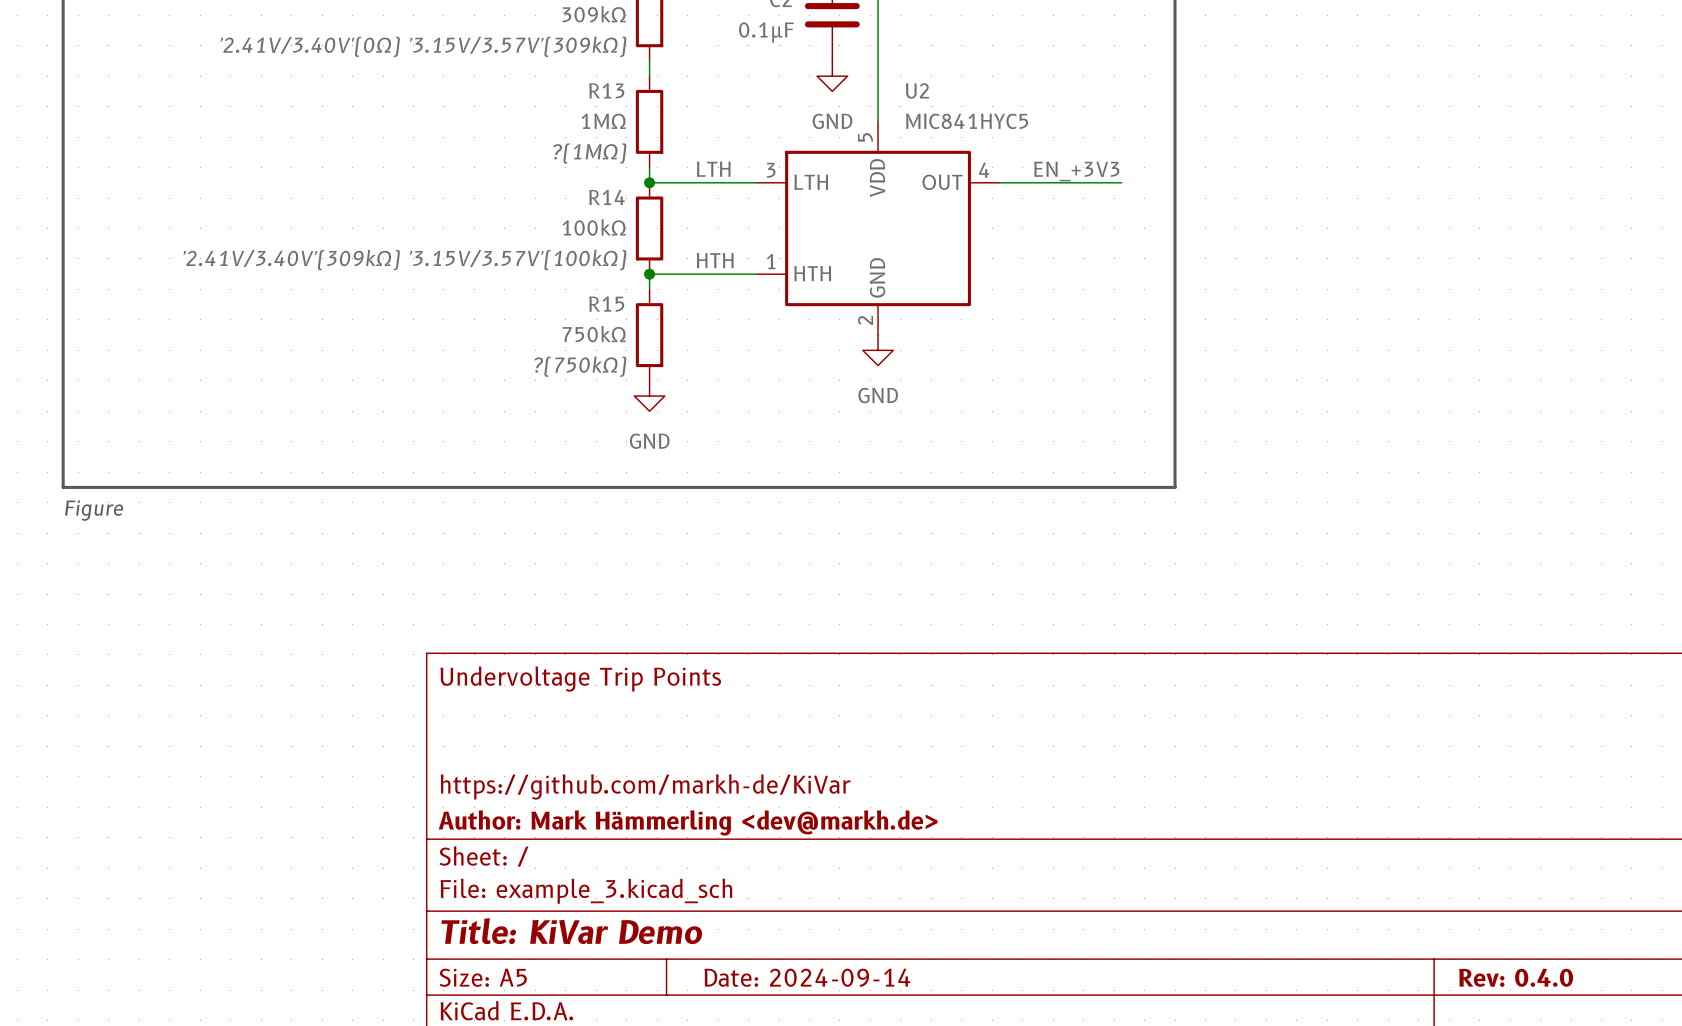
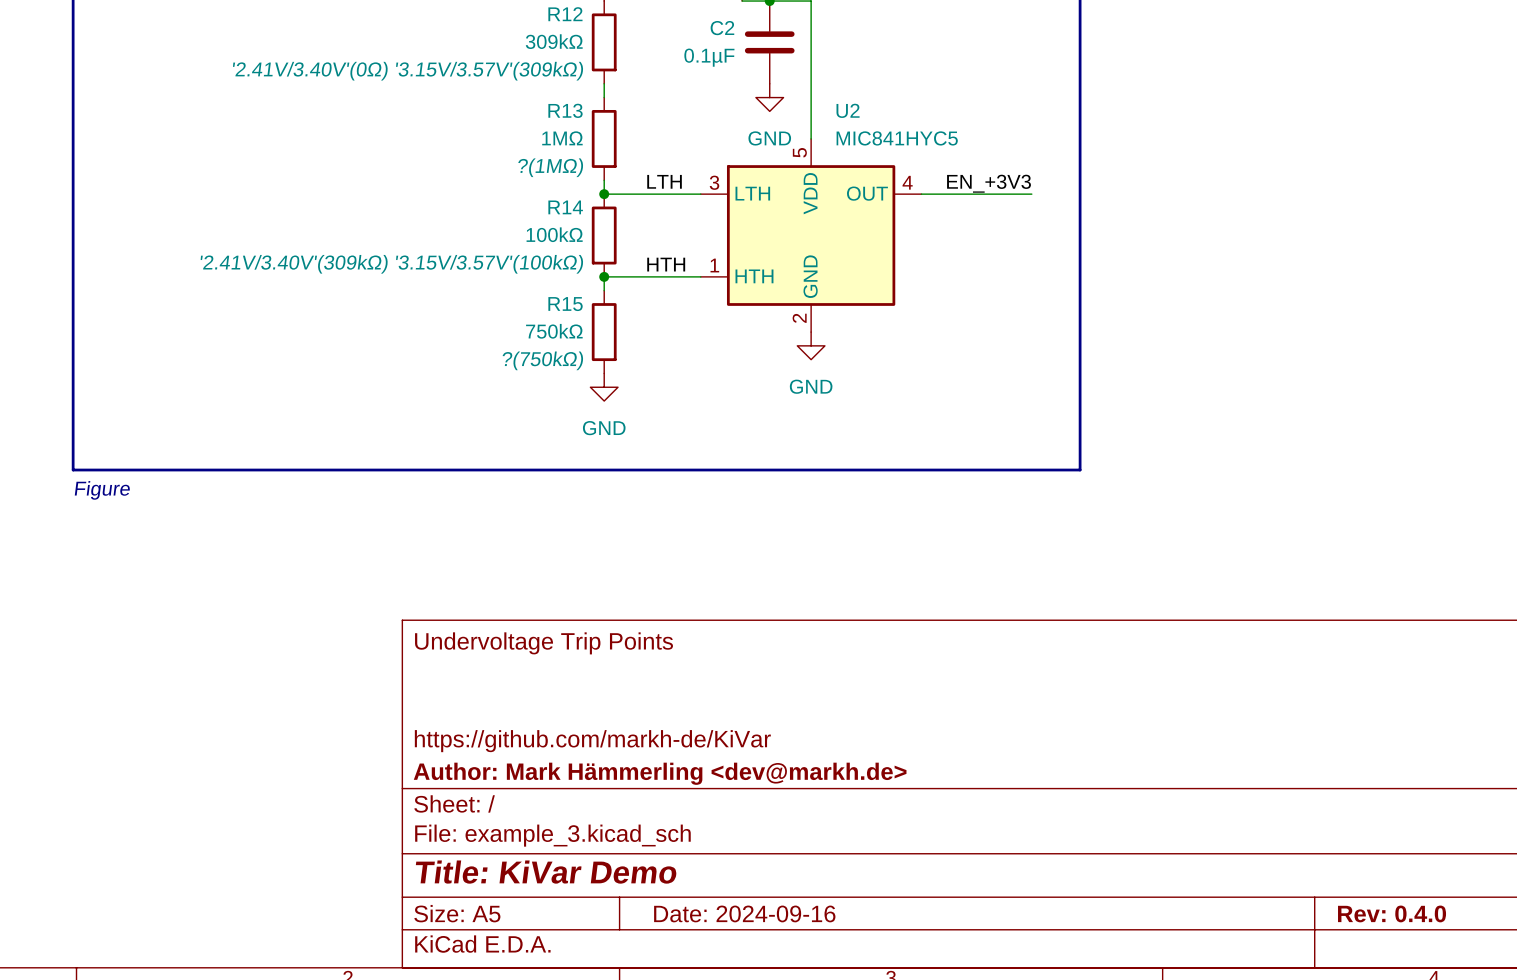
title block: Date: 2024-09-14 (807, 977) -> Date: 2024-09-16 (744, 913)

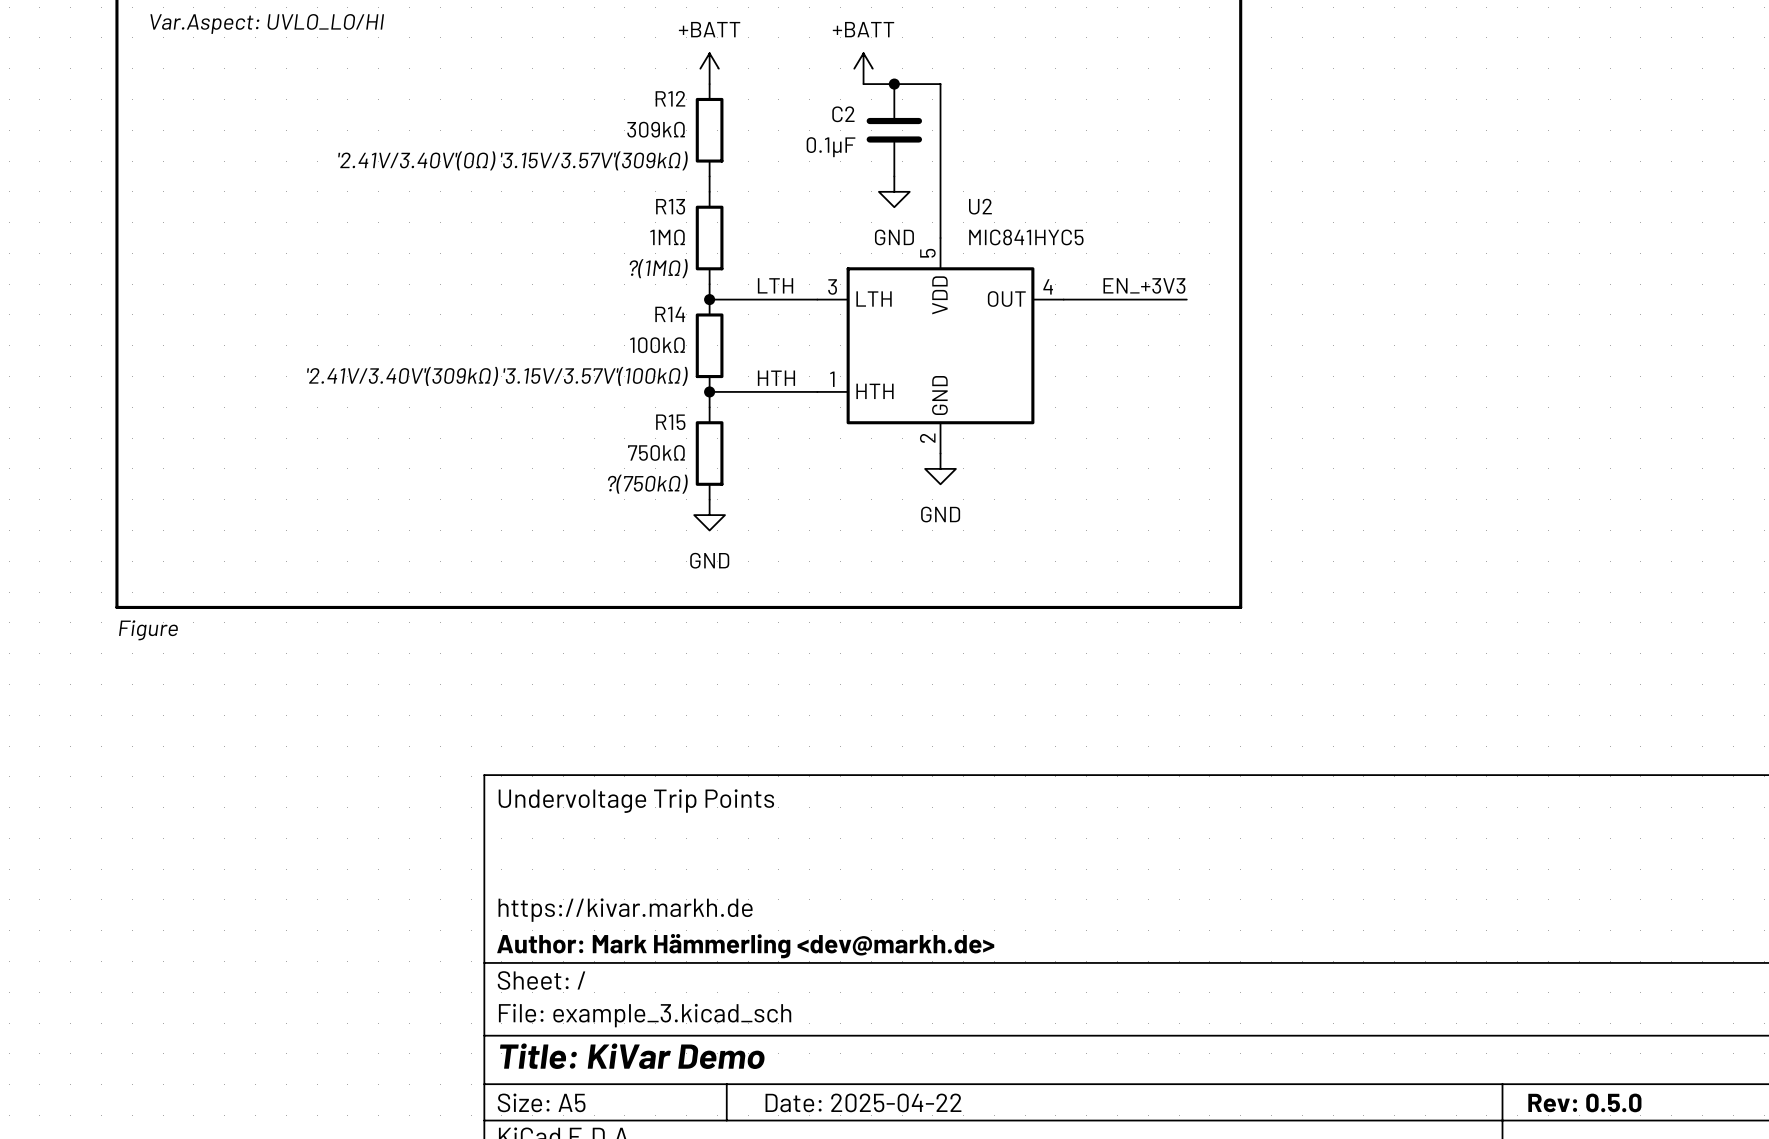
title block: https://github.com/markh-de/KiVar (592, 741) -> https://kivar.markh.de (625, 910)
title block: Date: 2024-09-16 (744, 913) -> Date: 2025-04-22 (863, 1102)
title block: Rev: 0.4.0 (1392, 913) -> Rev: 0.5.0 (1584, 1102)

